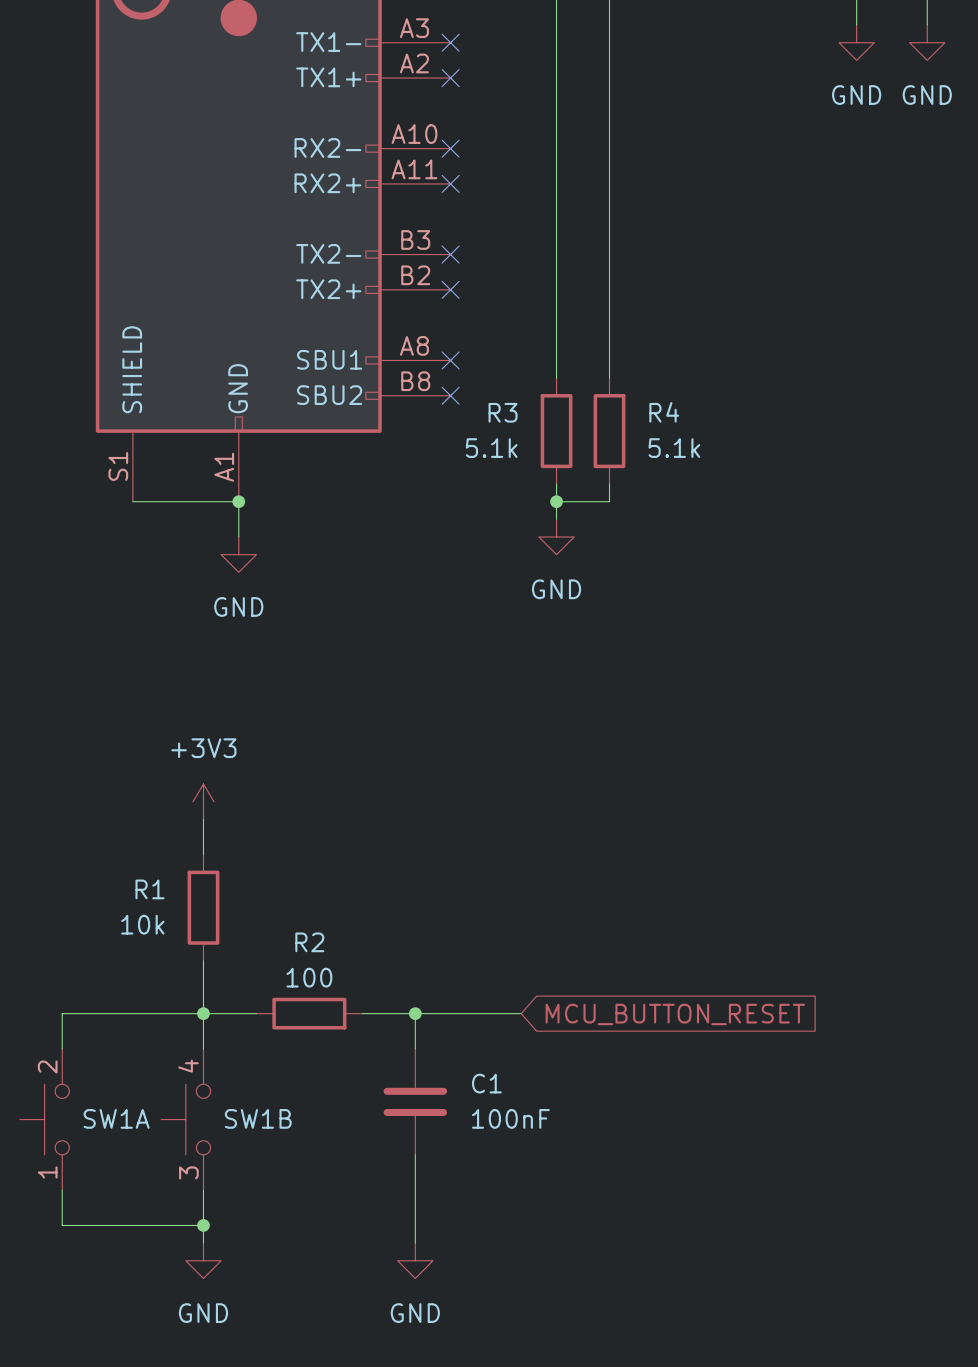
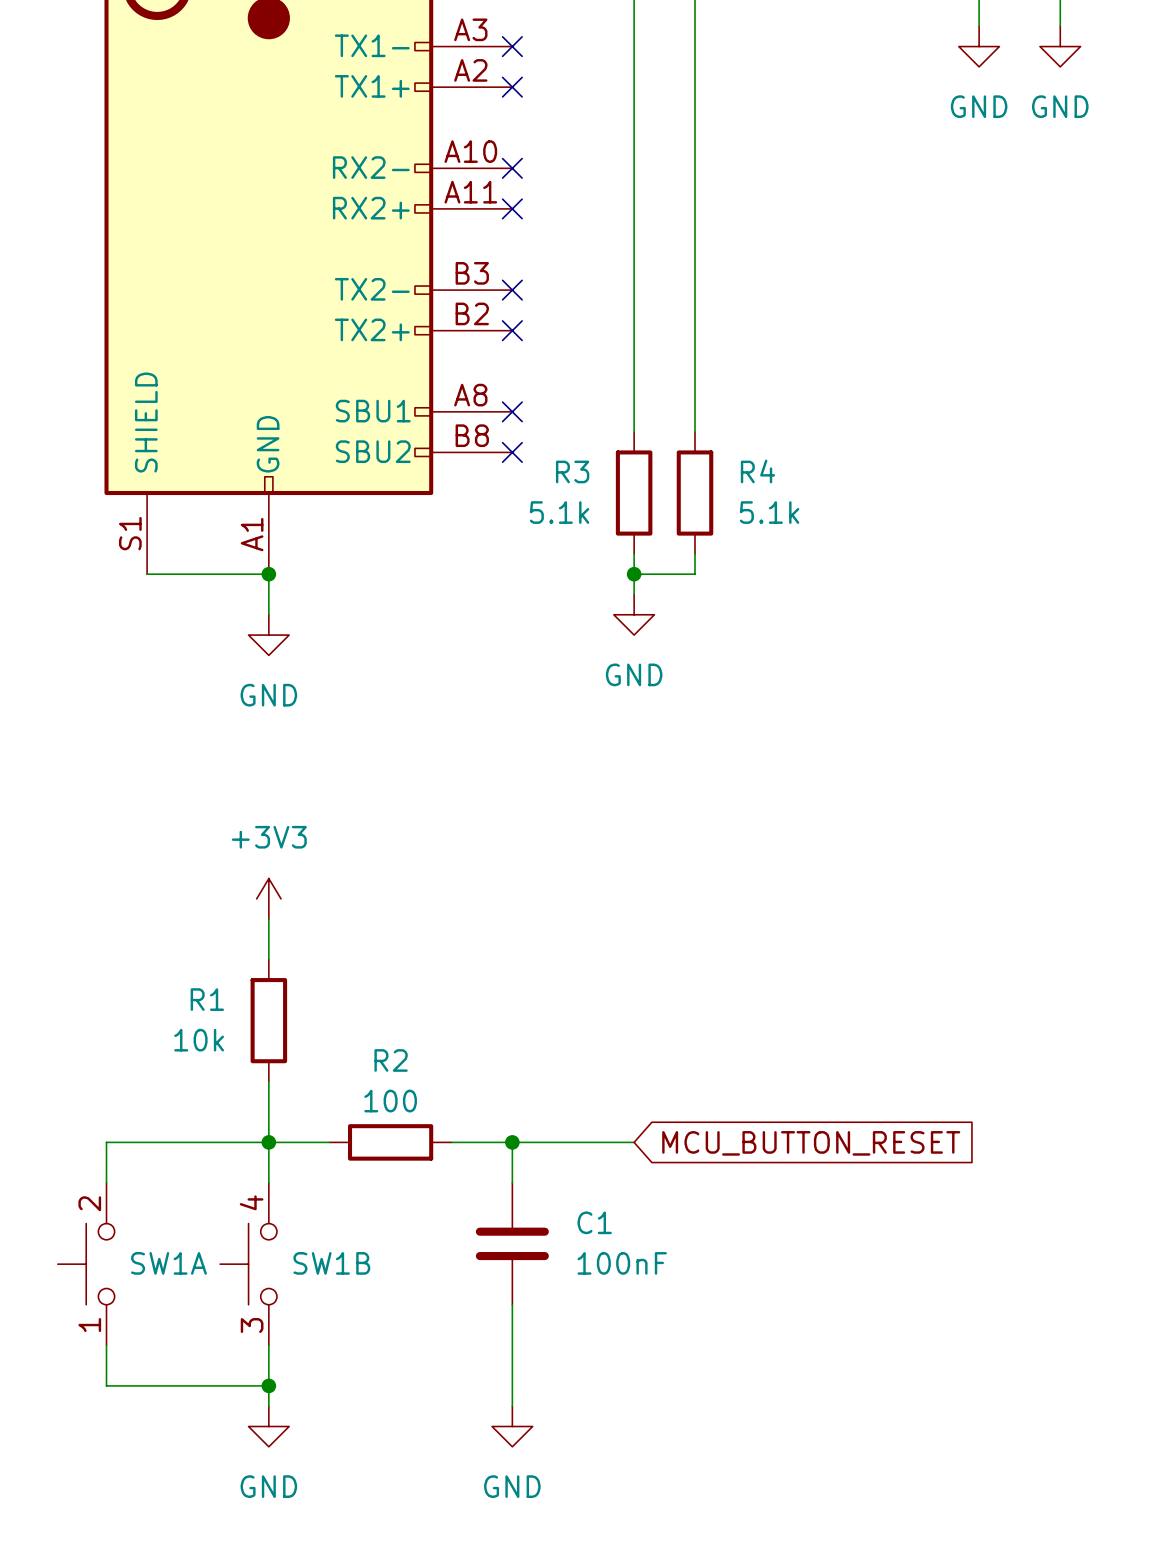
power symbol position: +3V3 (203, 801) -> +3V3 (268, 898)
wire: (203, 819) (203, 854) -> (268, 919) (268, 959)
R1 position: (203, 907) -> (268, 1020)
wire: (203, 960) (203, 1048) -> (268, 1081) (268, 1182)
junction position: (203, 1013) -> (268, 1142)
wire: (256, 1013) (62, 1013) (62, 1048) -> (329, 1142) (106, 1142) (106, 1182)
R2 position: (309, 1013) -> (390, 1142)
wire: (362, 1013) (521, 1013) -> (451, 1142) (634, 1142)
wire: (415, 1013) (415, 1048) -> (512, 1142) (512, 1182)
junction position: (415, 1013) -> (512, 1142)
global label position: MCU_BUTTON_RESET (675, 1014) -> MCU_BUTTON_RESET (811, 1143)
C1 position: (415, 1101) -> (512, 1243)
SW1A position: (44, 1119) -> (86, 1264)
SW1B position: (185, 1119) -> (248, 1264)
wire: (415, 1154) (415, 1243) -> (512, 1304) (512, 1406)
wire: (62, 1190) (62, 1225) (203, 1225) -> (106, 1345) (106, 1385) (268, 1385)
wire: (203, 1190) (203, 1243) -> (268, 1345) (268, 1406)
junction position: (203, 1225) -> (268, 1385)
power symbol position: GND (203, 1260) -> GND (268, 1426)
power symbol position: GND (415, 1260) -> GND (512, 1426)

